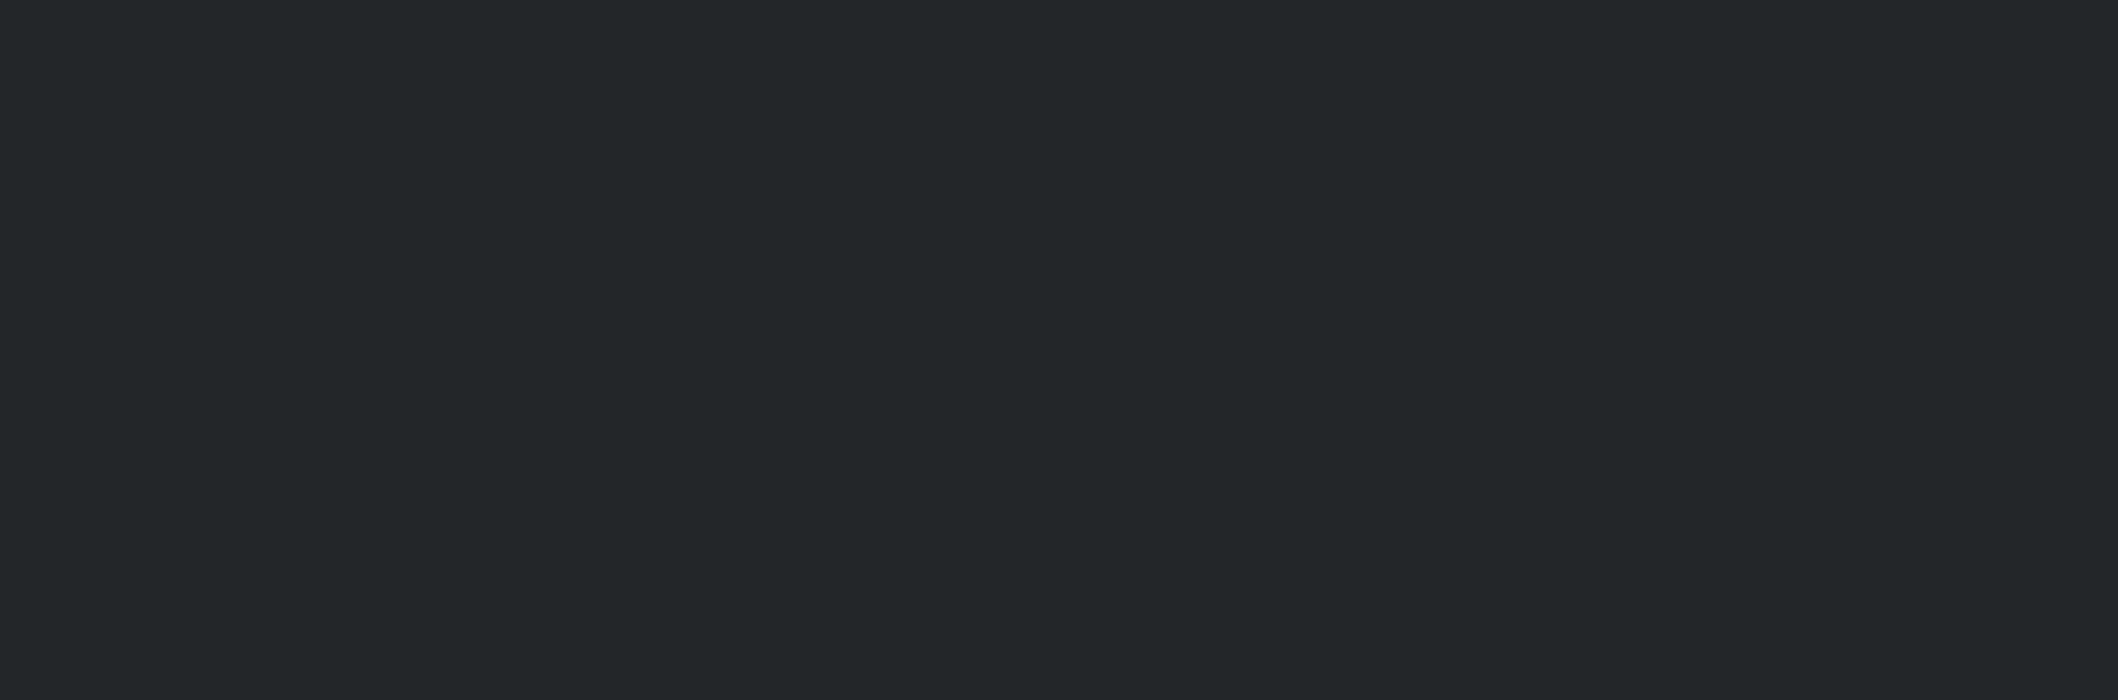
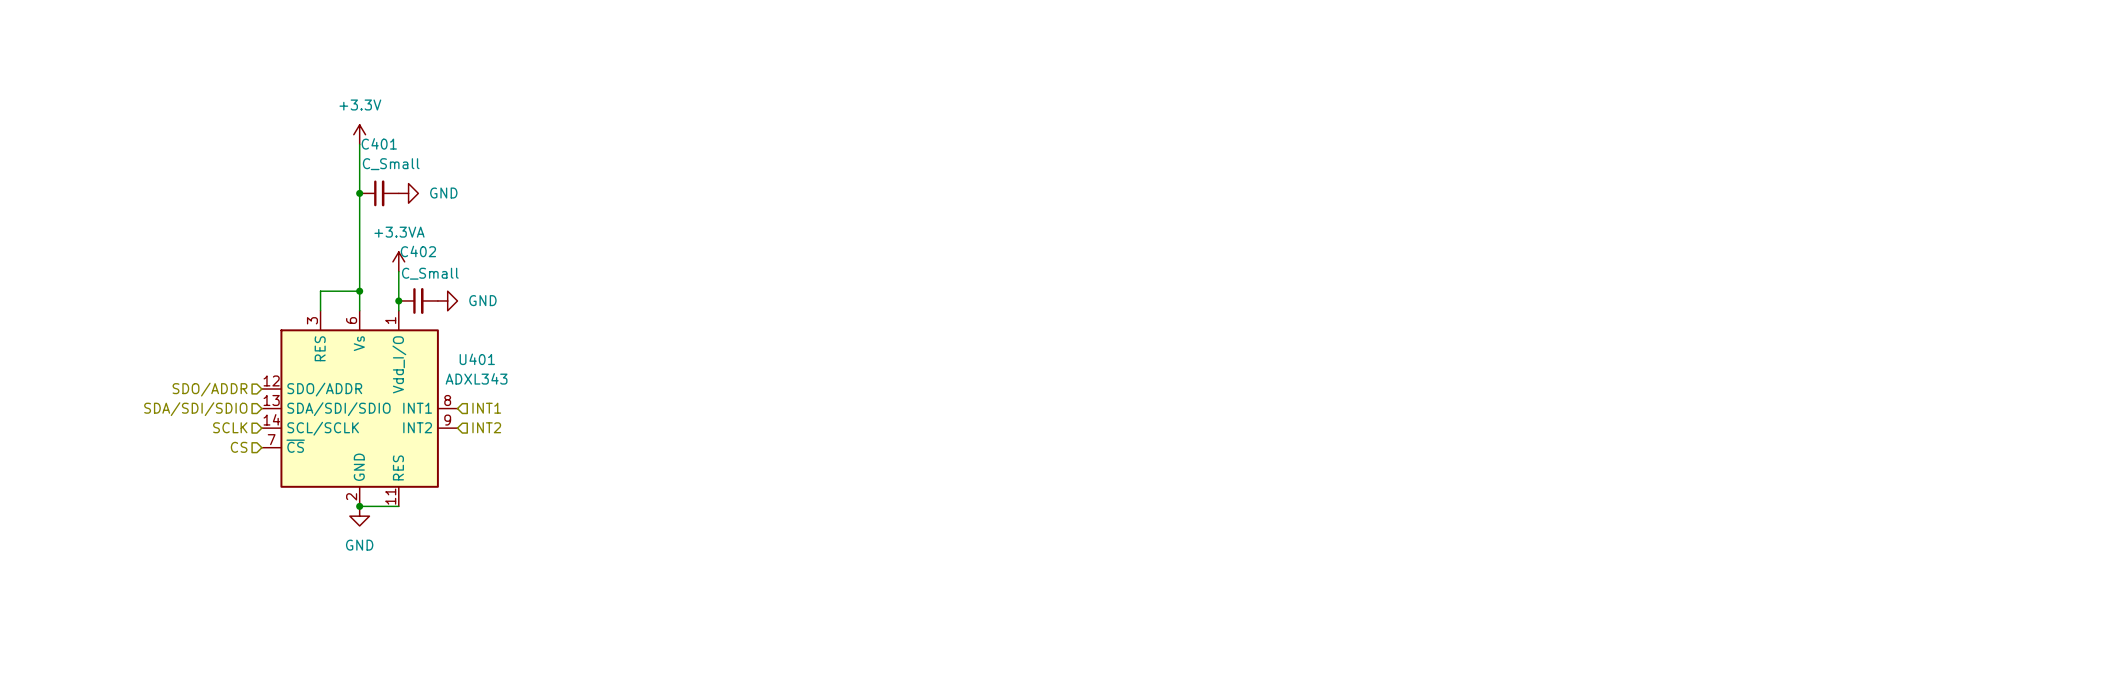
power symbol: none -> +3.3V (359, 134)
wire: none -> (359, 144) (359, 310)
junction: none -> (359, 193)
C401: none -> C_Small (379, 193)
power symbol: none -> GND (408, 193)
power symbol: none -> +3.3VA (398, 261)
wire: none -> (398, 271) (398, 310)
wire: none -> (359, 291) (320, 291) (320, 310)
junction: none -> (359, 291)
junction: none -> (398, 300)
C402: none -> C_Small (418, 300)
power symbol: none -> GND (447, 300)
hierarchical label: none -> SDO/ADDR (210, 389)
U401: none -> ADXL343 (359, 408)
hierarchical label: none -> INT1 (486, 408)
hierarchical label: none -> SDA/SDI/SDIO (195, 409)
hierarchical label: none -> SCLK (230, 427)
hierarchical label: none -> INT2 (486, 427)
hierarchical label: none -> CS (239, 447)
wire: none -> (359, 506) (398, 506)
junction: none -> (359, 506)
power symbol: none -> GND (359, 516)

